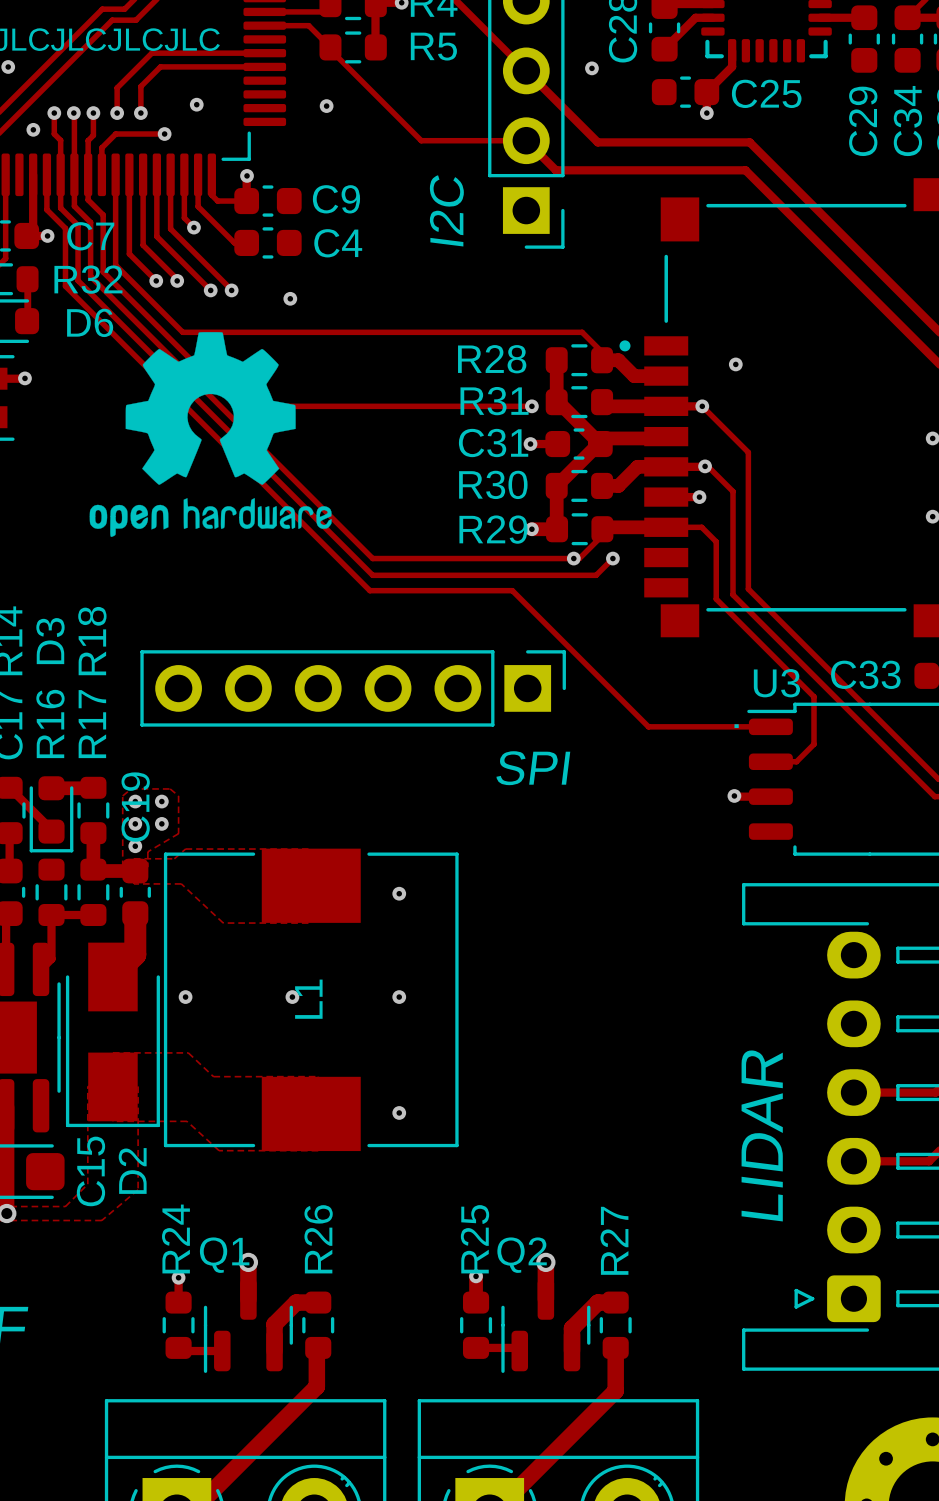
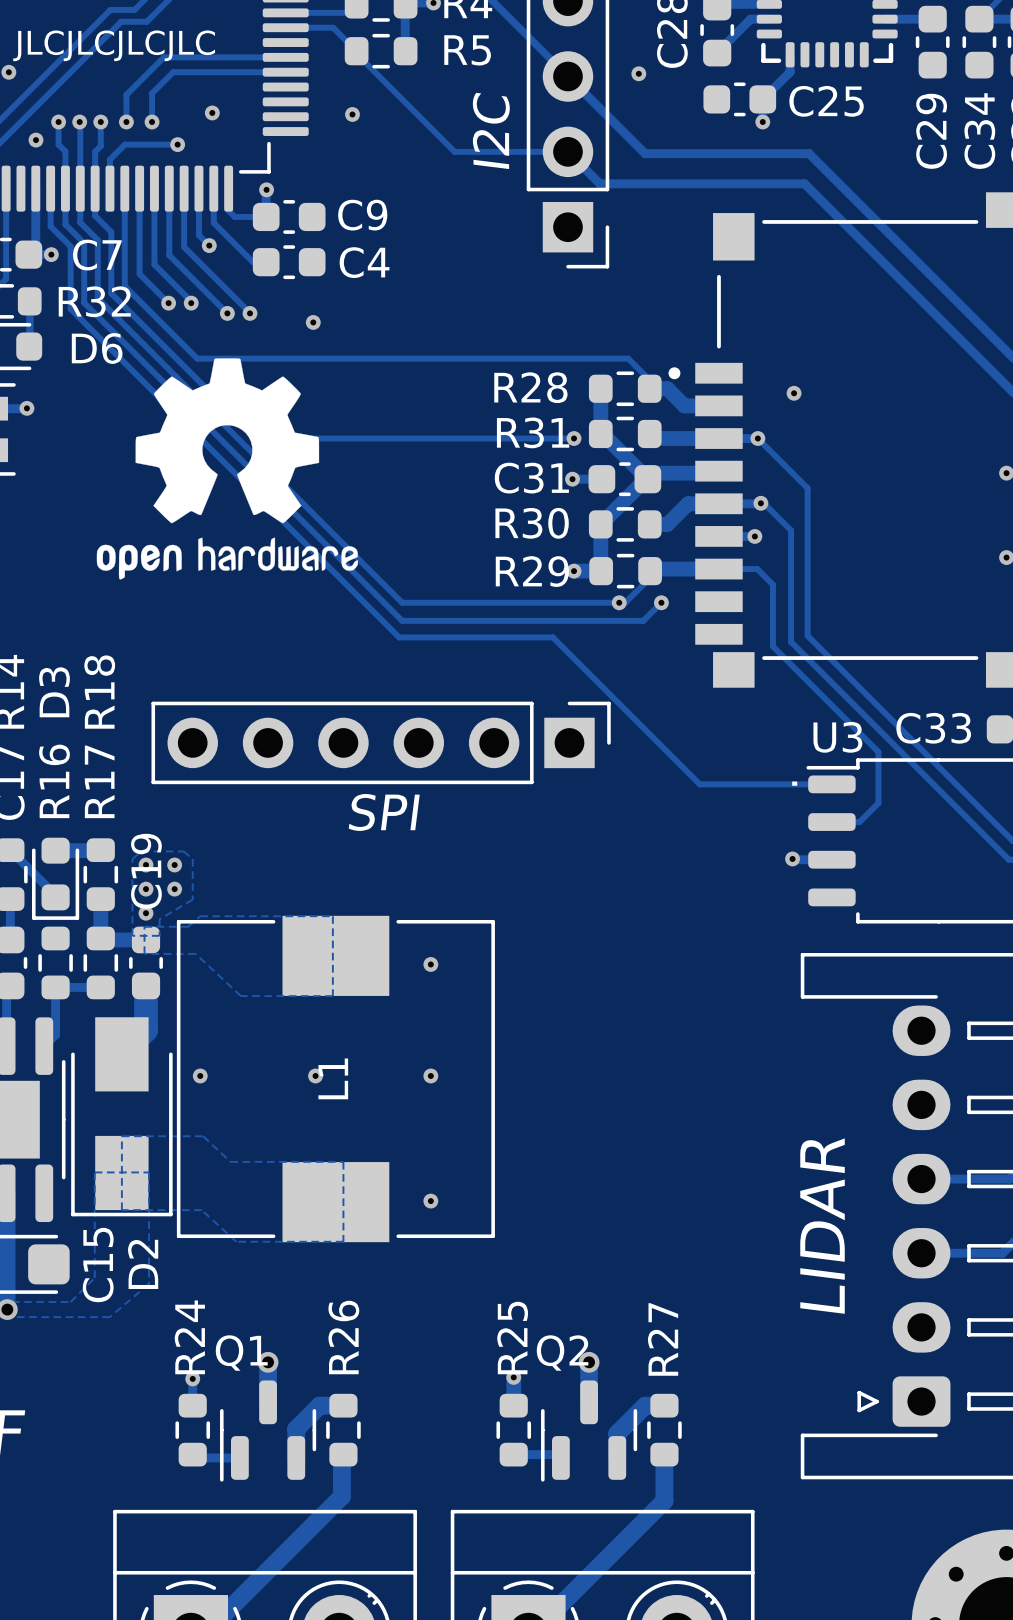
text position: I2C (446, 210) -> I2C (491, 130)
text position: SPI (533, 768) -> SPI (384, 812)

